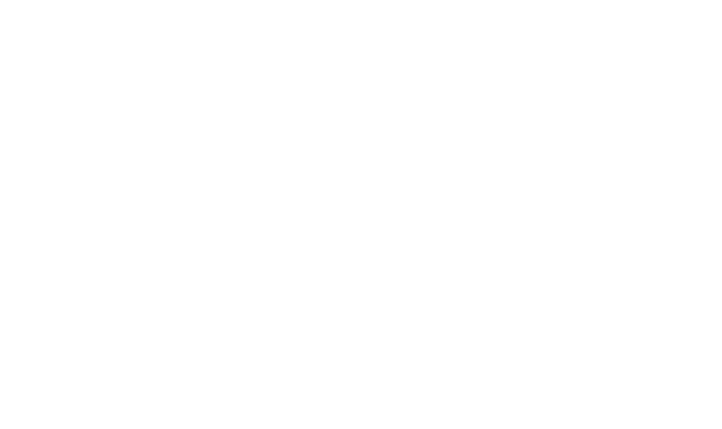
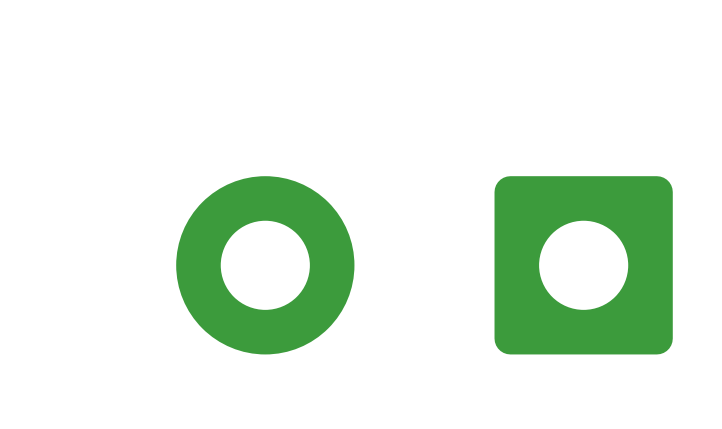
part: none -> (424, 265)

